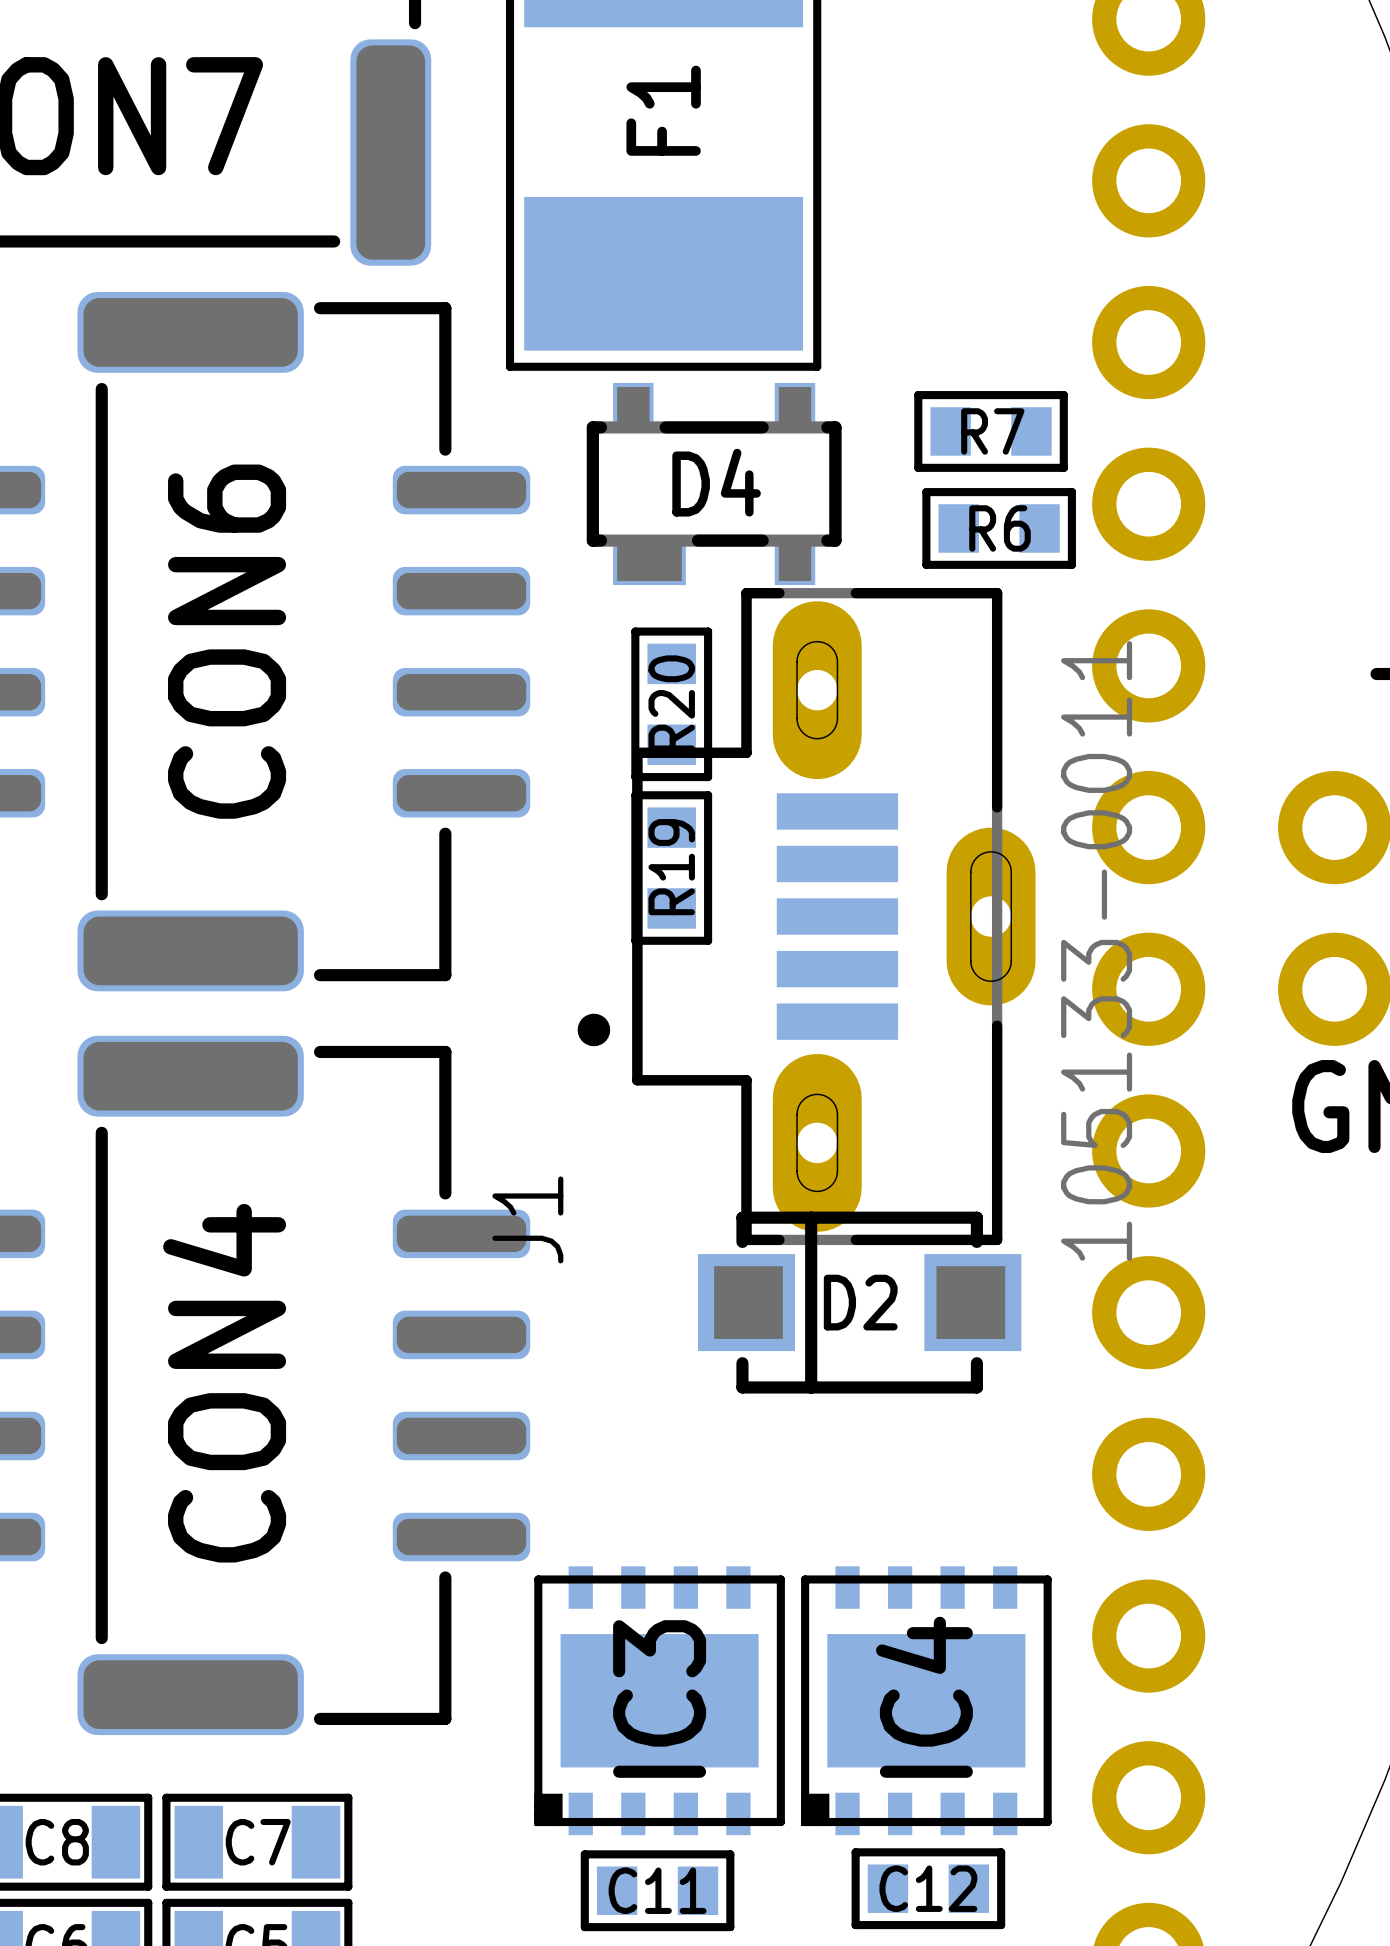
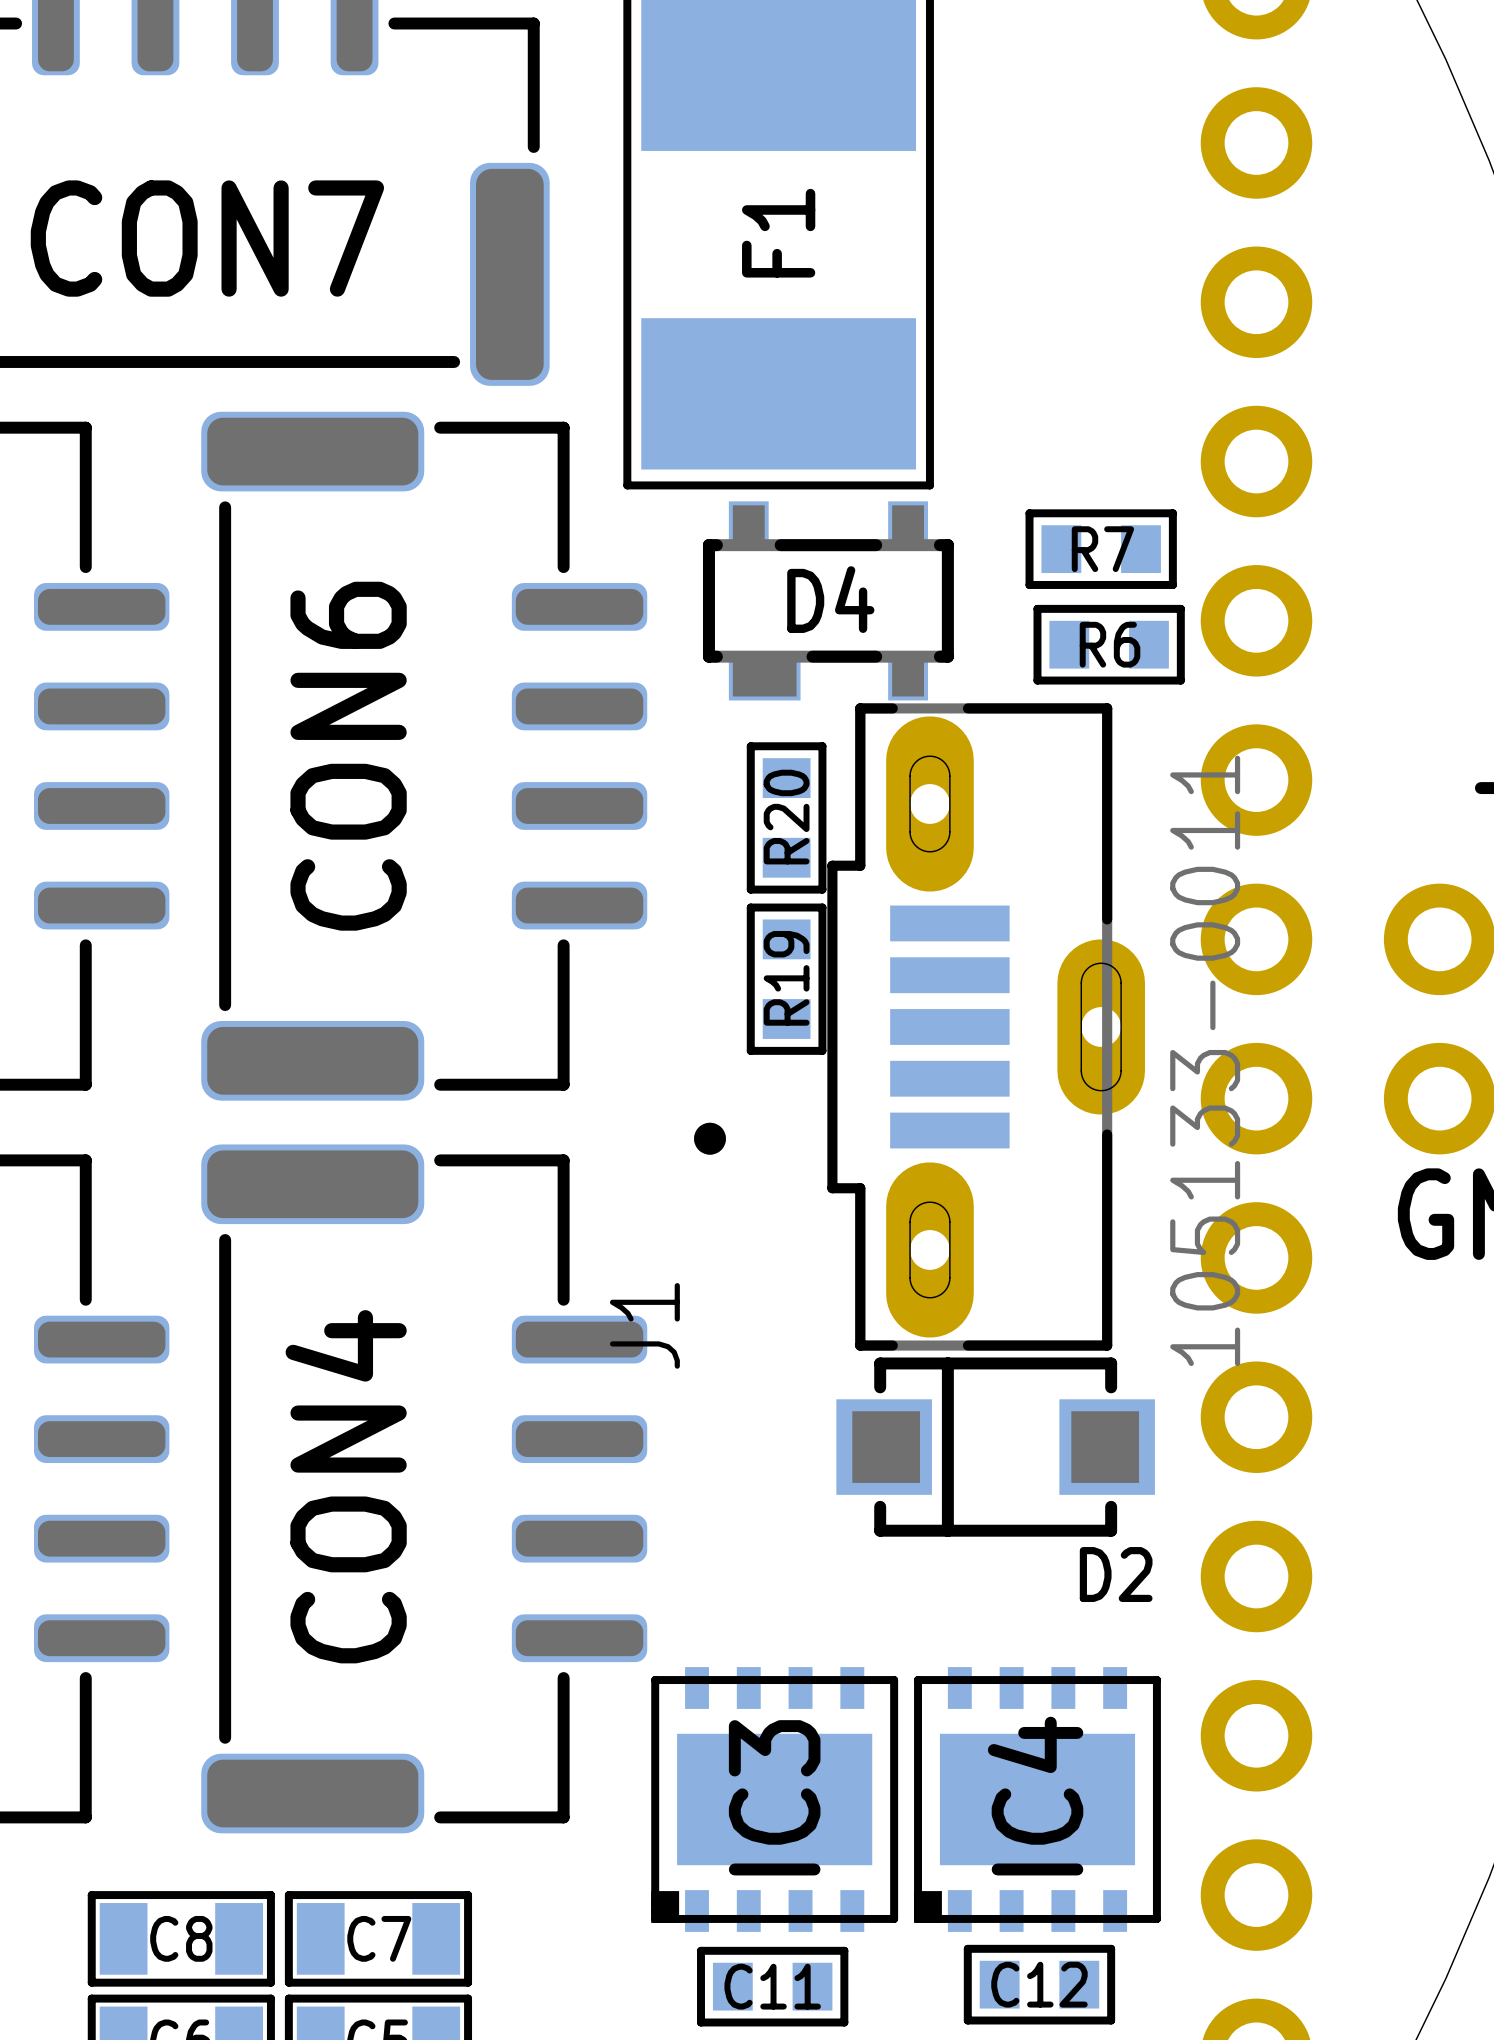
J1 footprint: [577, 588, 1036, 1246] -> [694, 703, 1145, 1351]
D2 position: (859, 1302) -> (995, 1447)
D2 name position: D2 (860, 1302) -> D2 (1116, 1574)

